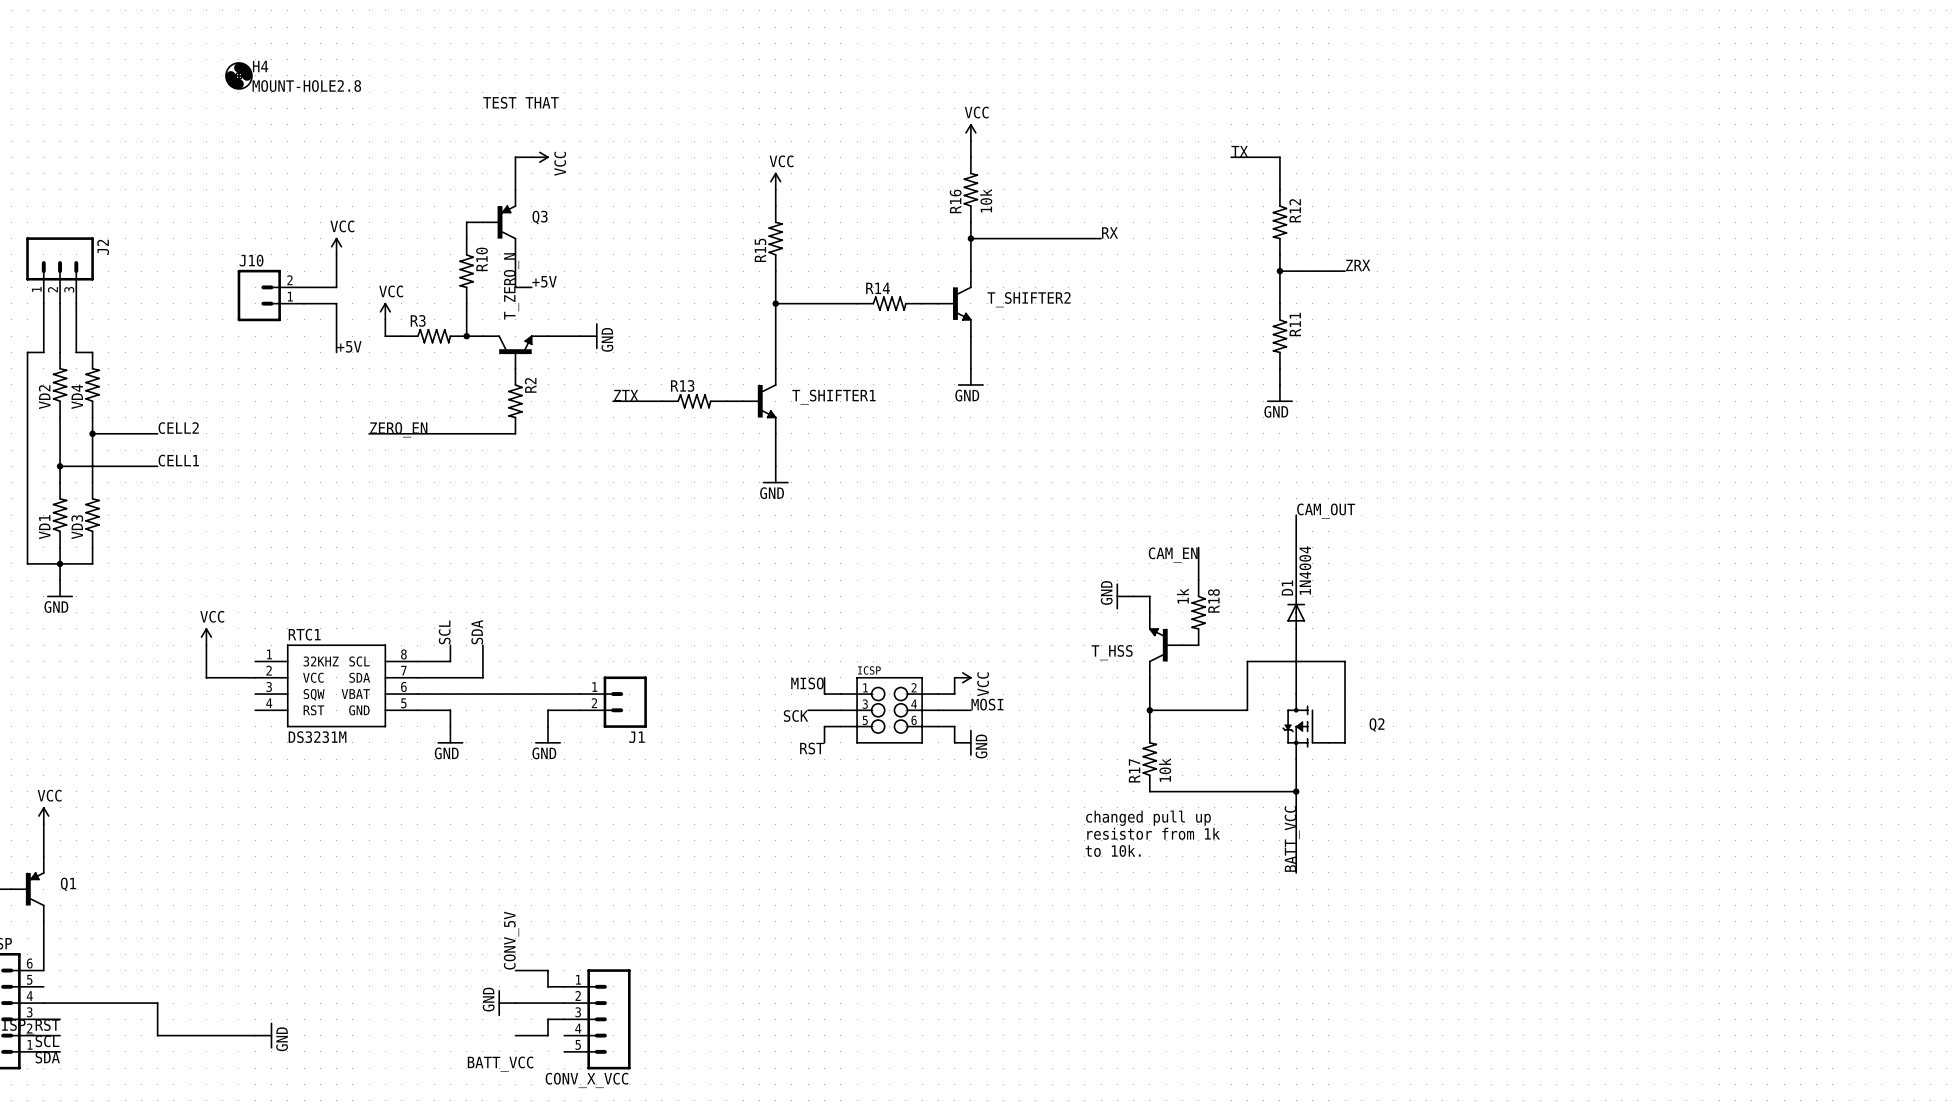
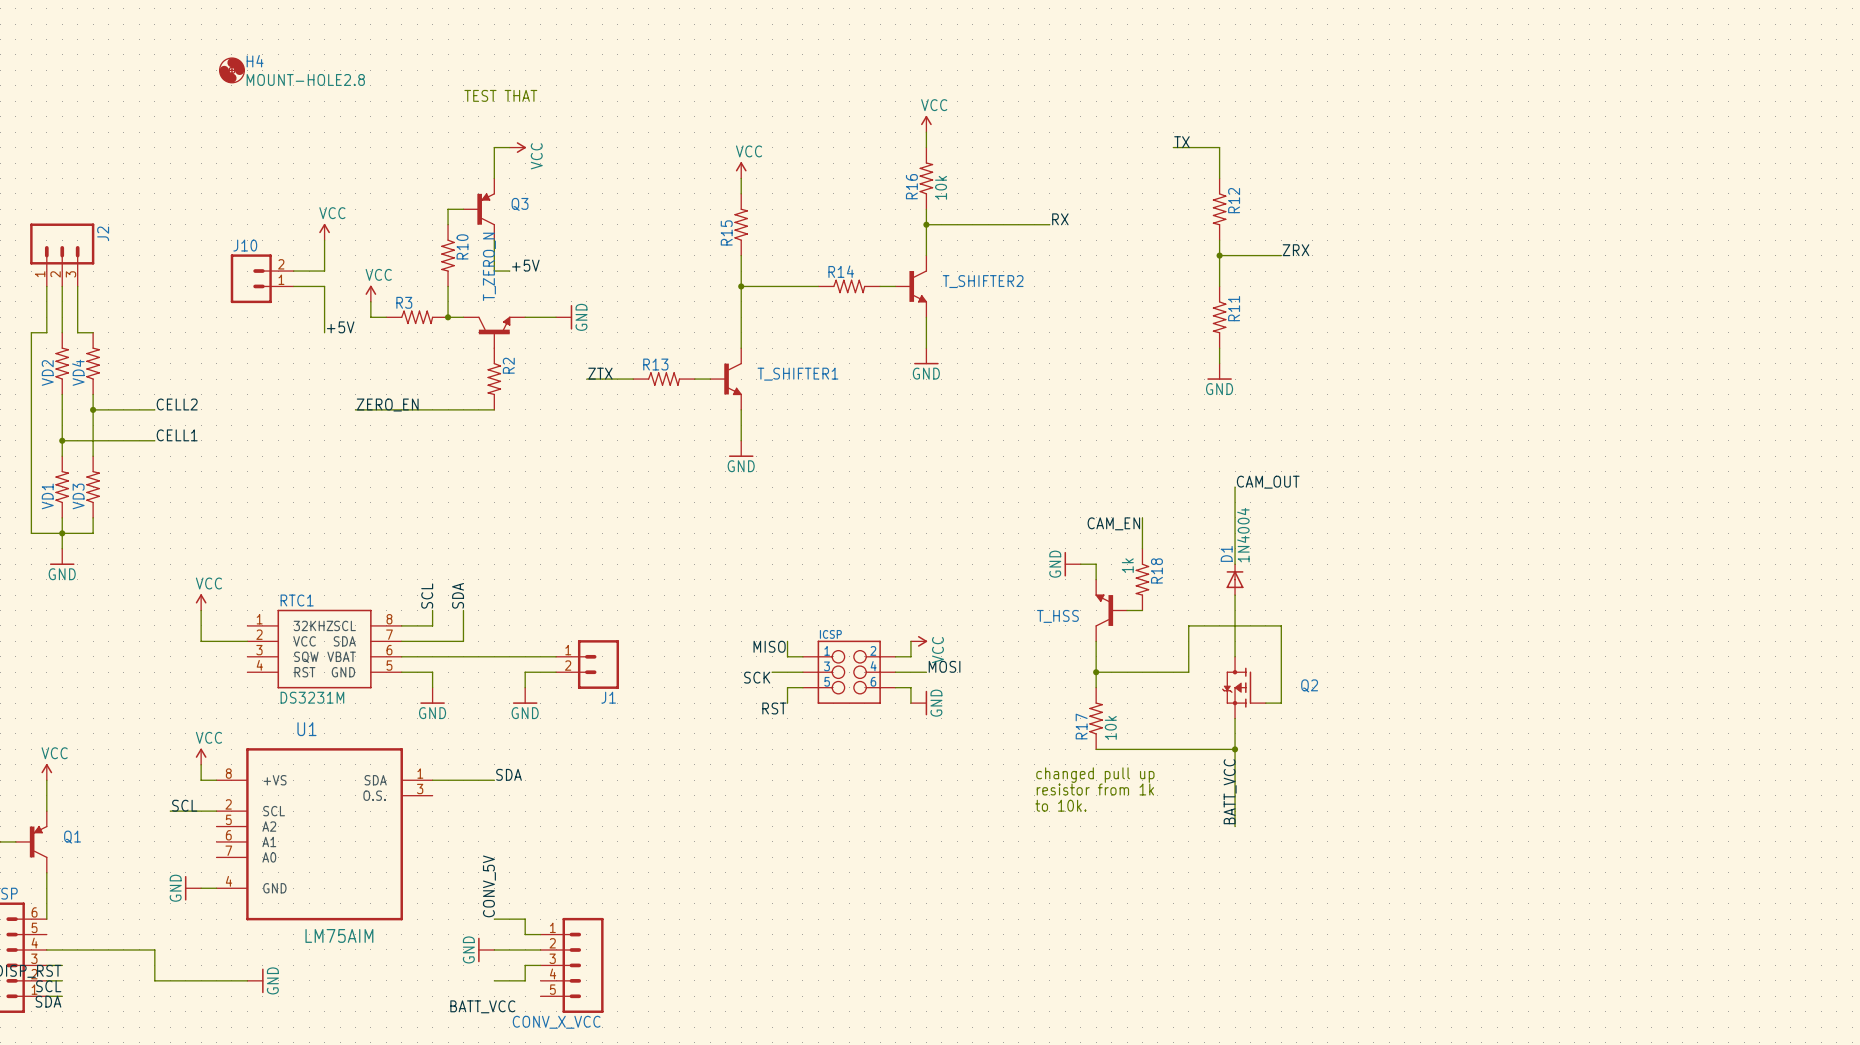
power symbol: none -> VCC (201, 756)
wire: none -> (201, 764) (201, 780) (216, 780)
label: none -> SDA (509, 774)
wire: none -> (432, 780) (494, 780)
label: none -> SCL (184, 805)
wire: none -> (170, 811) (216, 811)
U1: none -> LM75AIM (324, 834)
power symbol: none -> GND (193, 888)
wire: none -> (201, 888) (216, 888)

